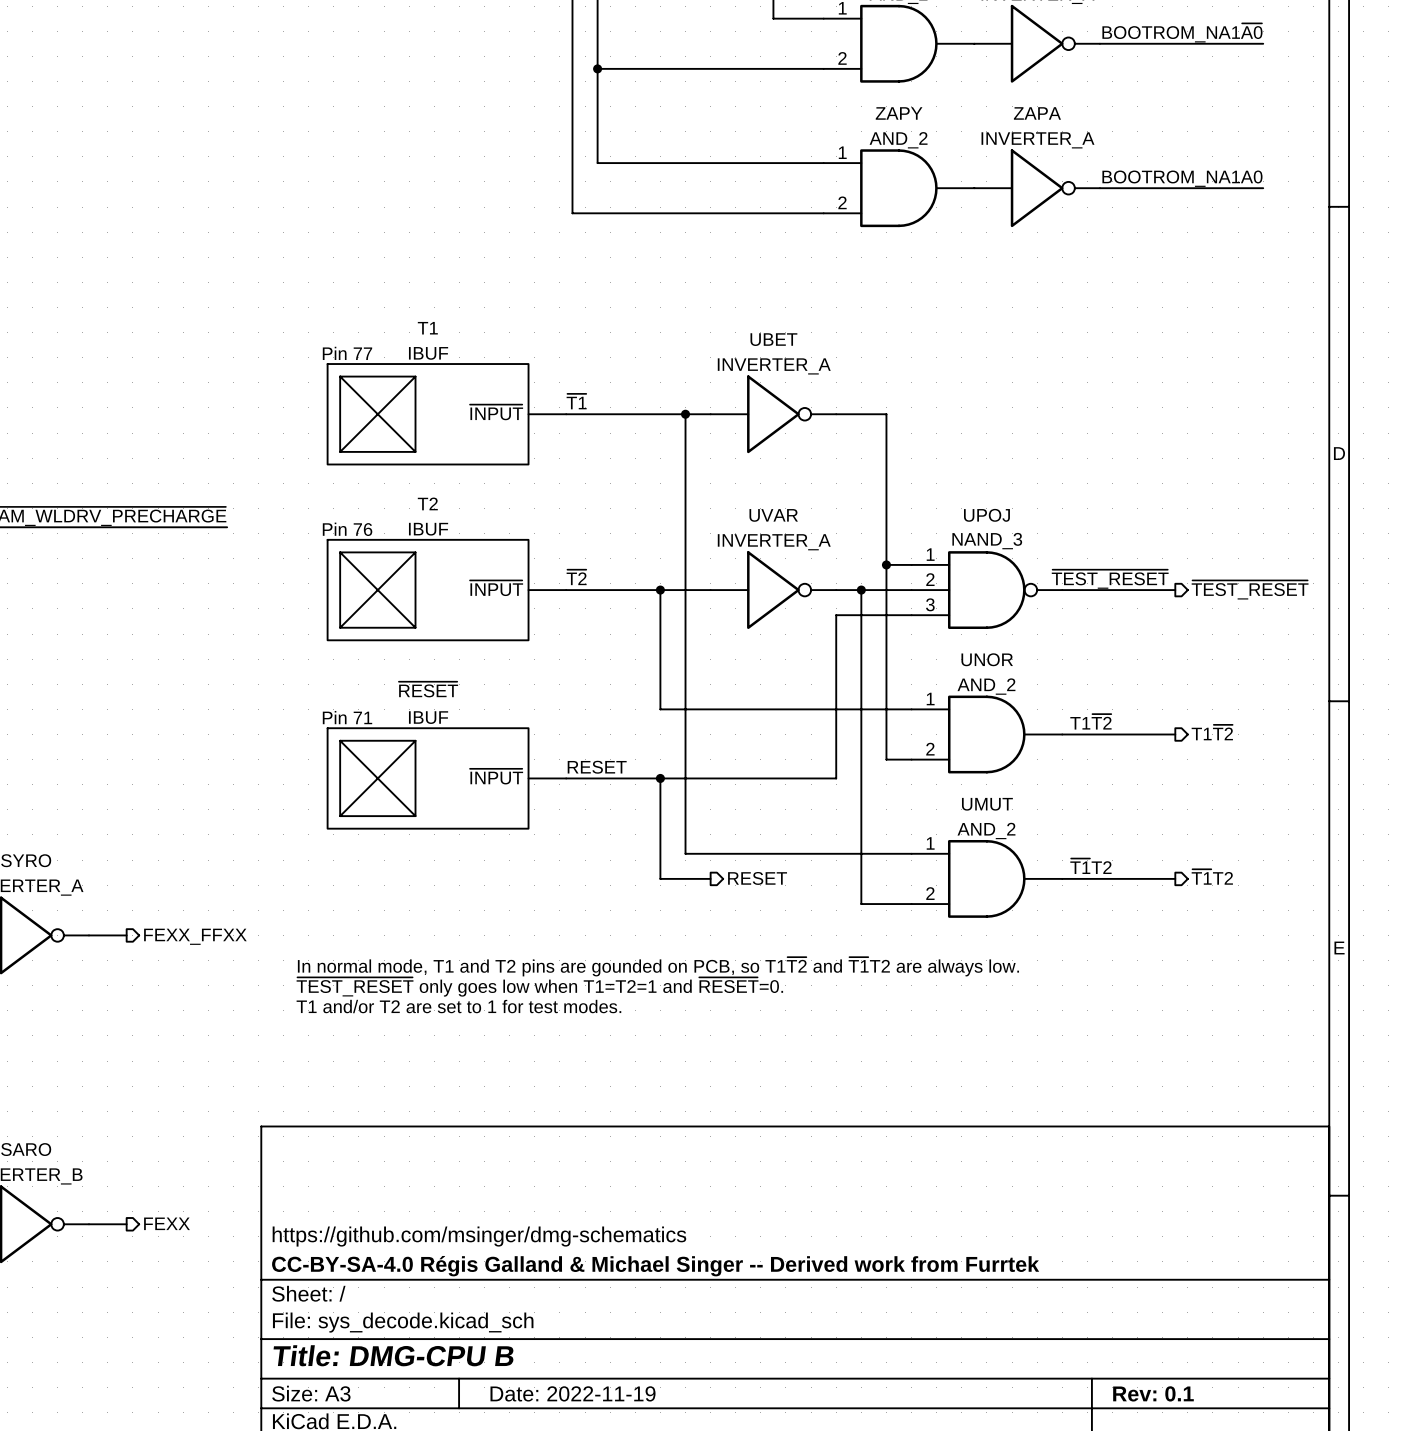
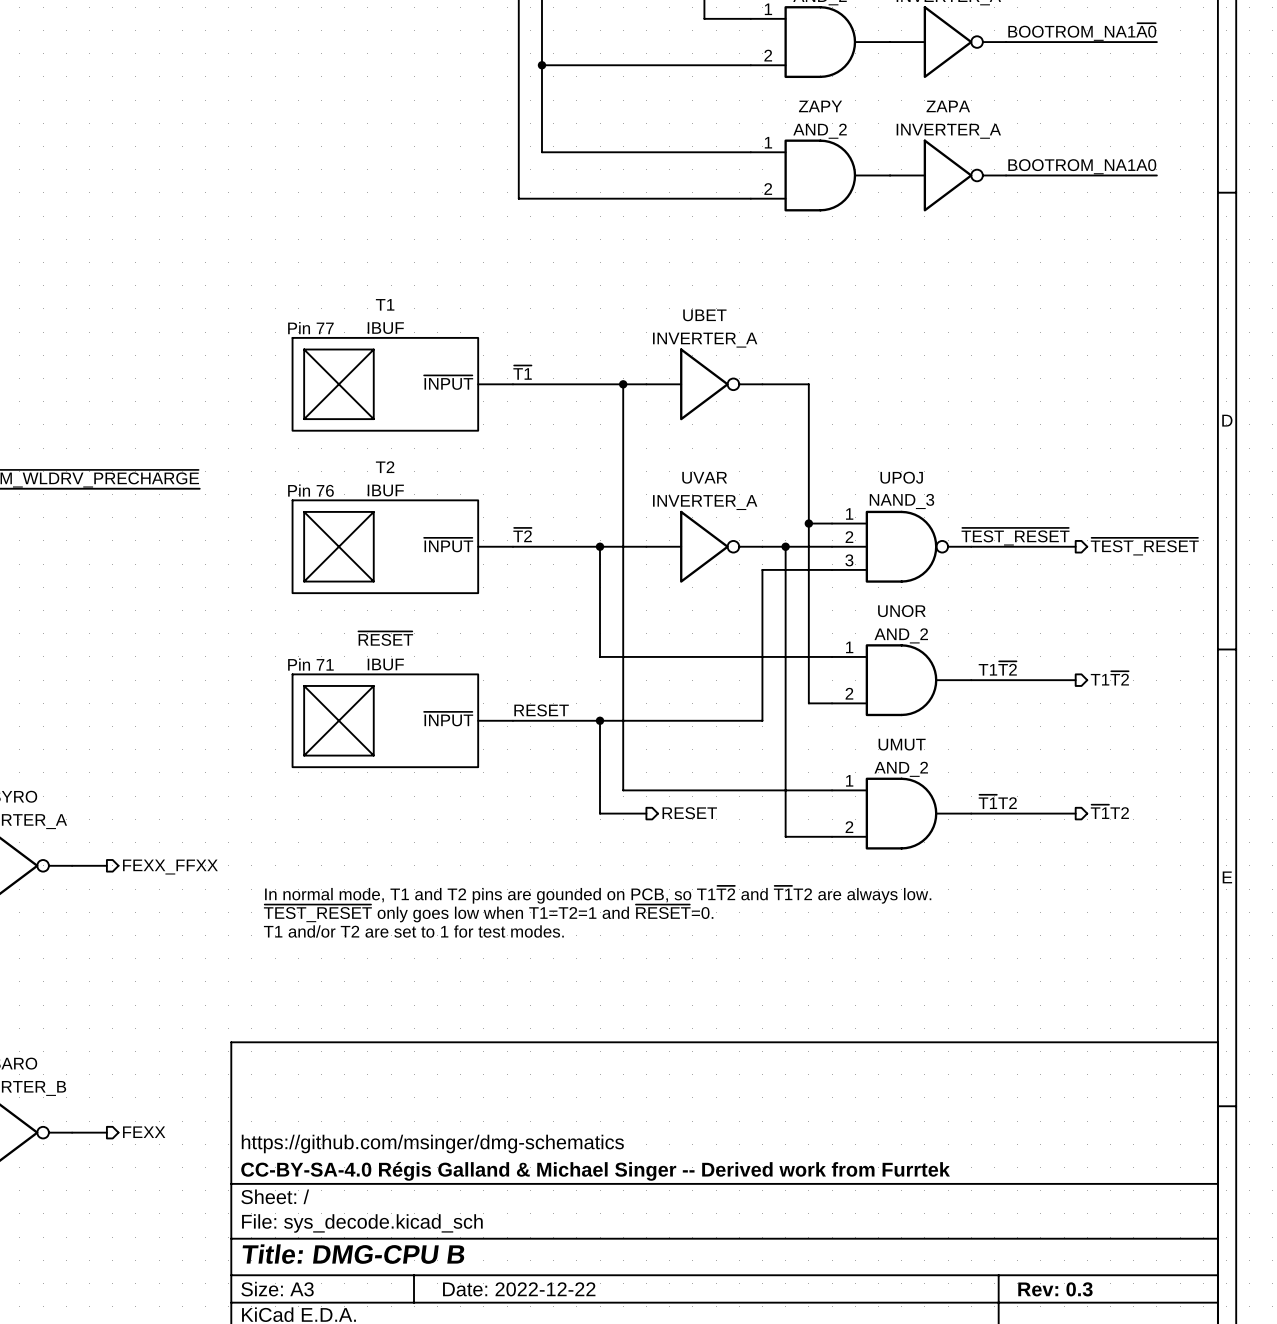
title block: Date: 2022-11-19 (573, 1393) -> Date: 2022-12-22 (519, 1289)
title block: Rev: 0.1 (1153, 1393) -> Rev: 0.3 (1055, 1289)

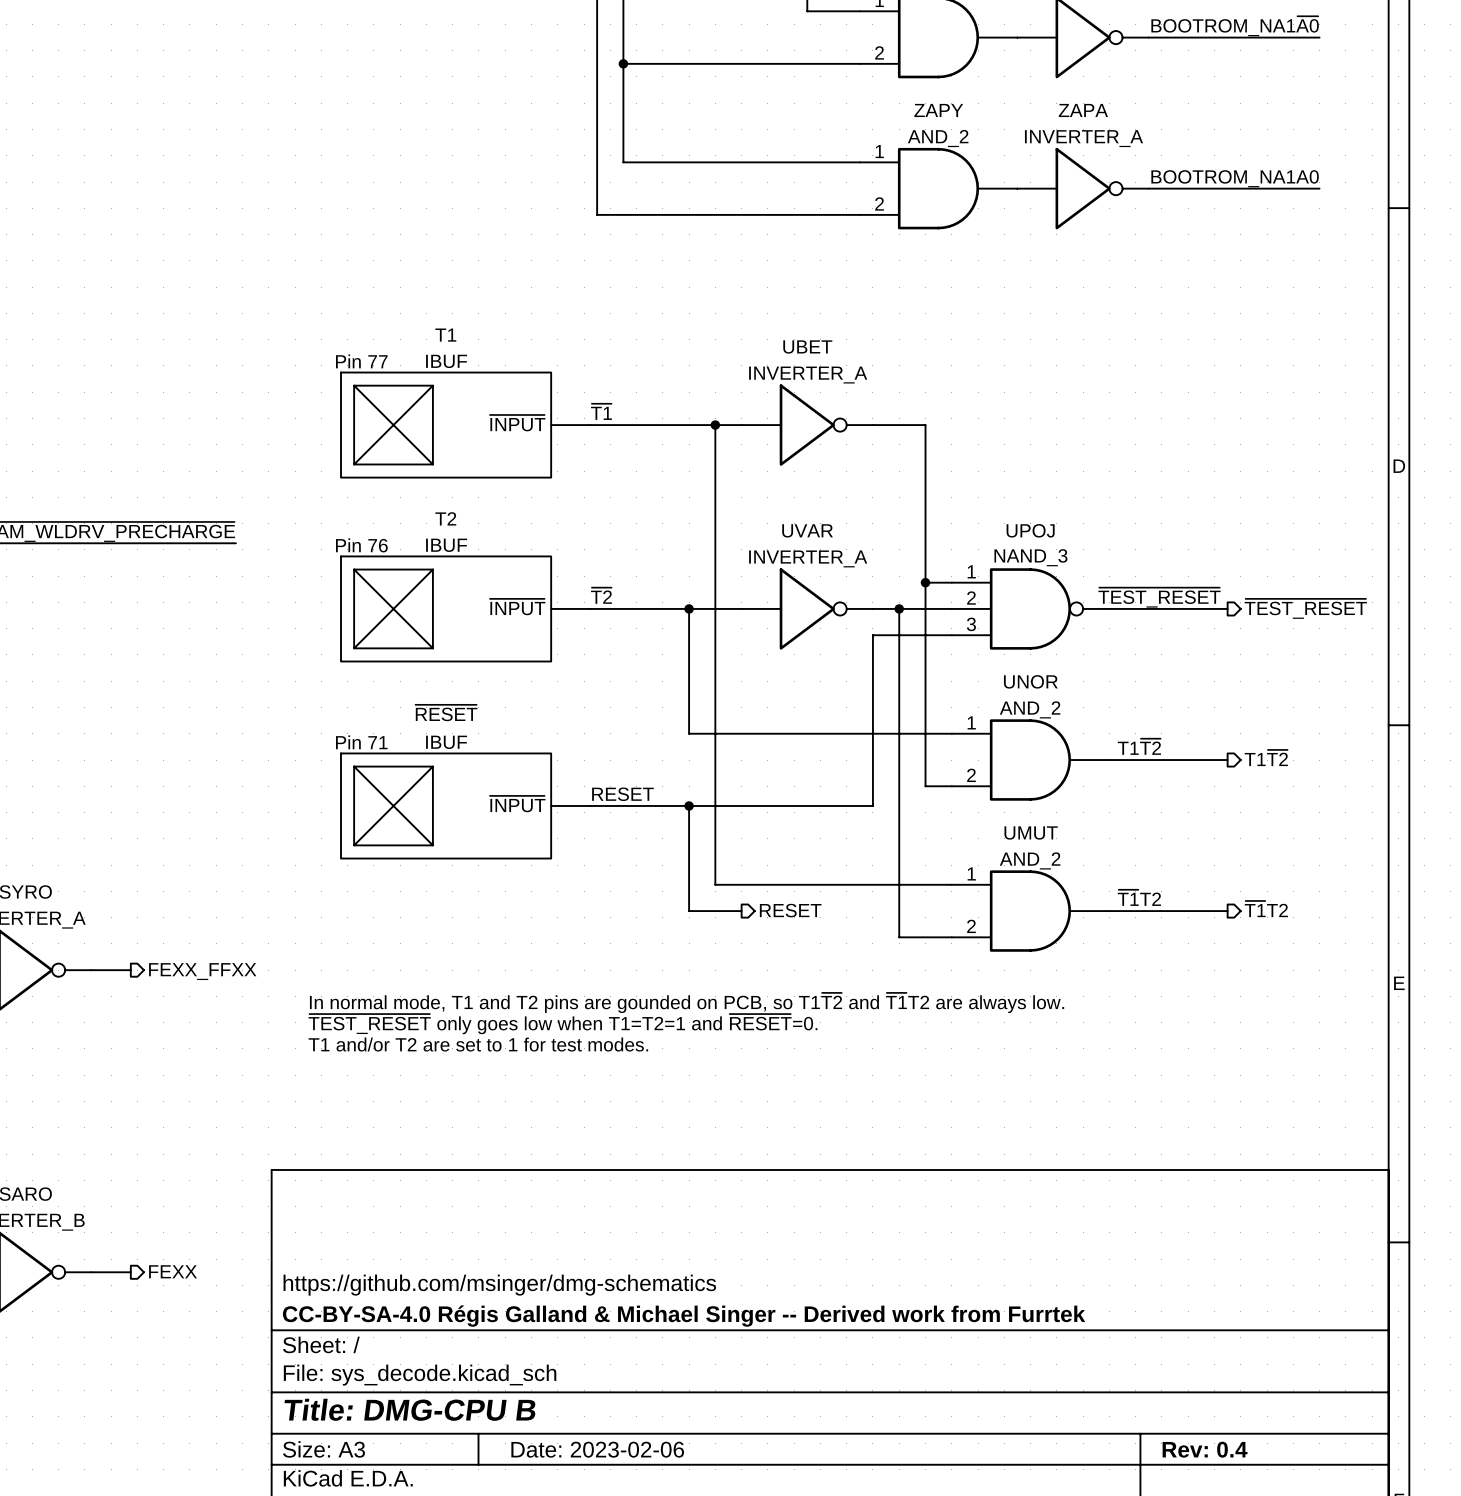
title block: Date: 2022-12-22 (519, 1289) -> Date: 2023-02-06 (597, 1449)
title block: Rev: 0.3 (1055, 1289) -> Rev: 0.4 (1205, 1449)

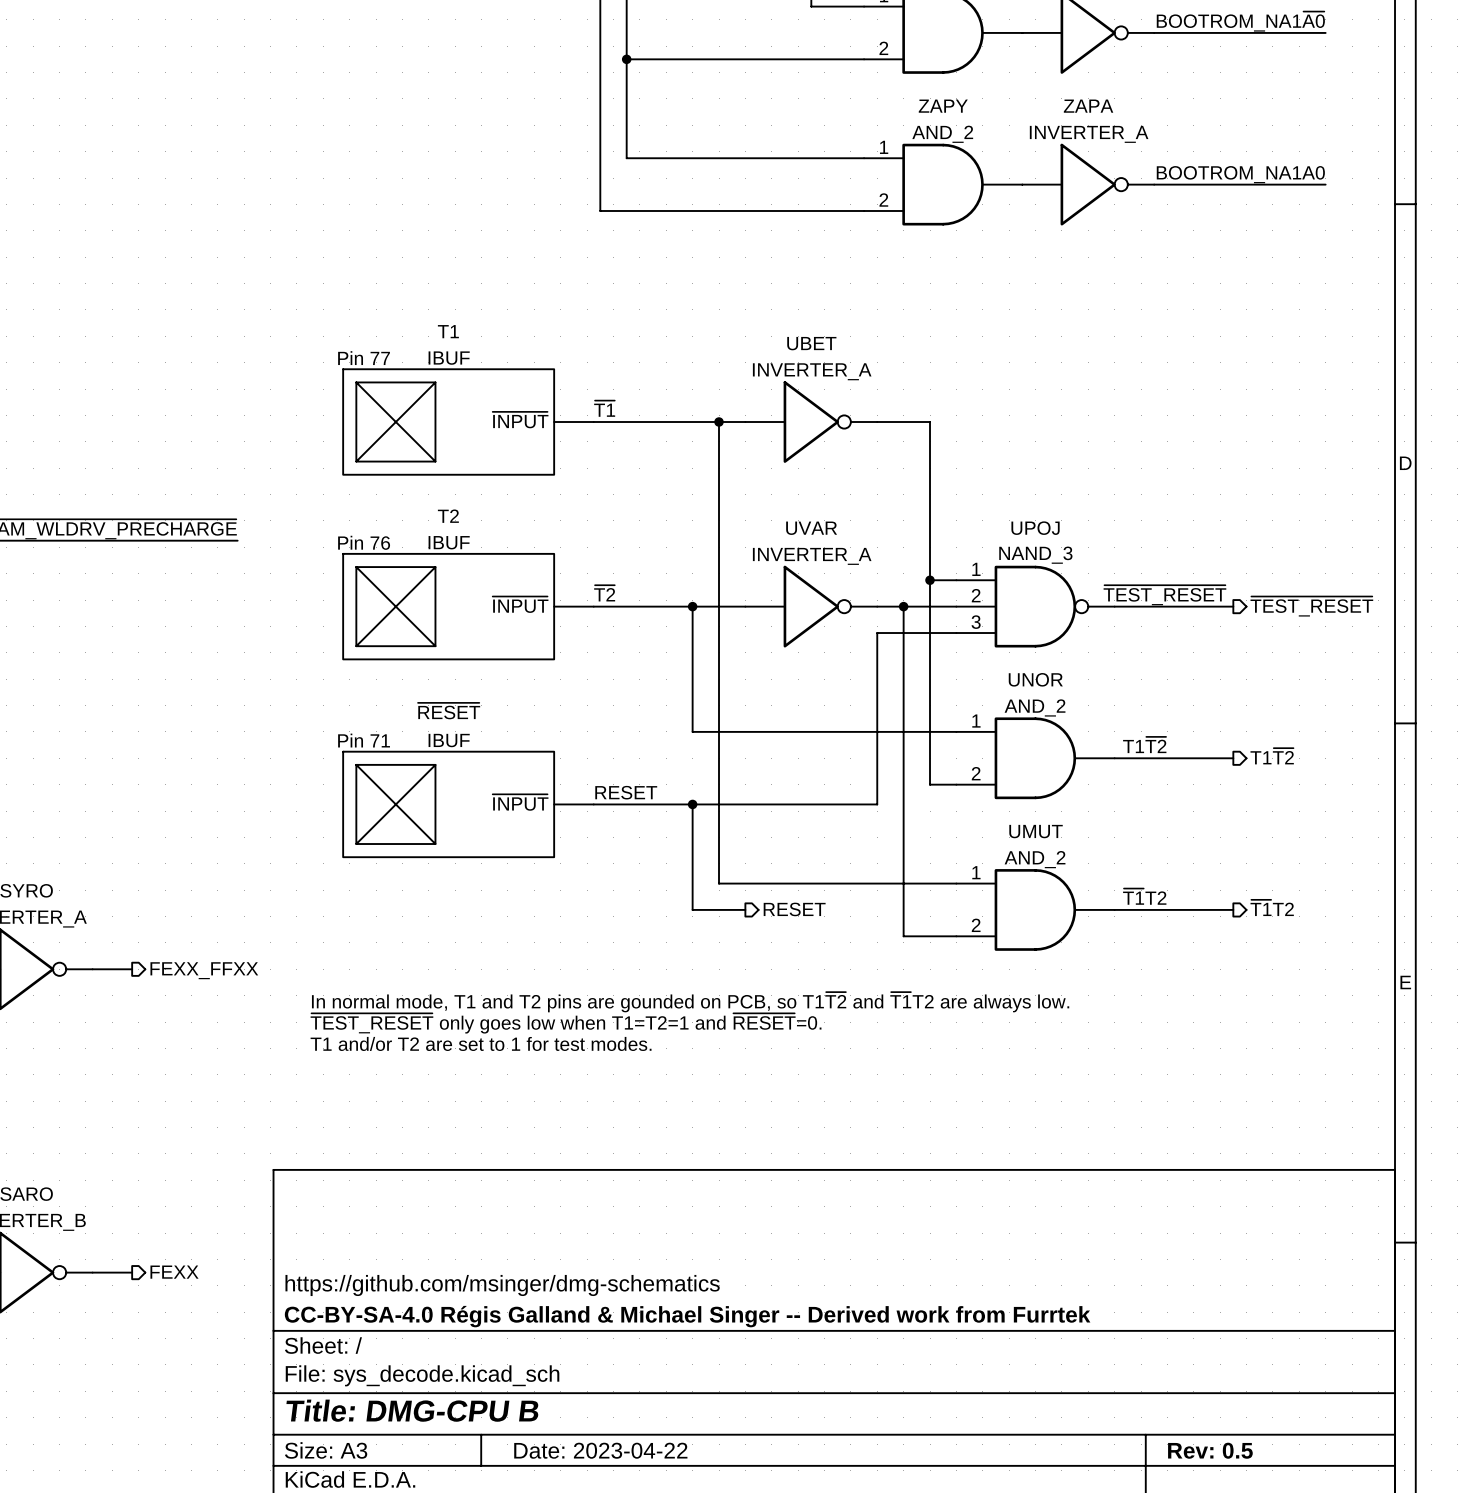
title block: Date: 2023-02-06 (597, 1449) -> Date: 2023-04-22 (600, 1450)
title block: Rev: 0.4 (1205, 1449) -> Rev: 0.5 (1210, 1450)

